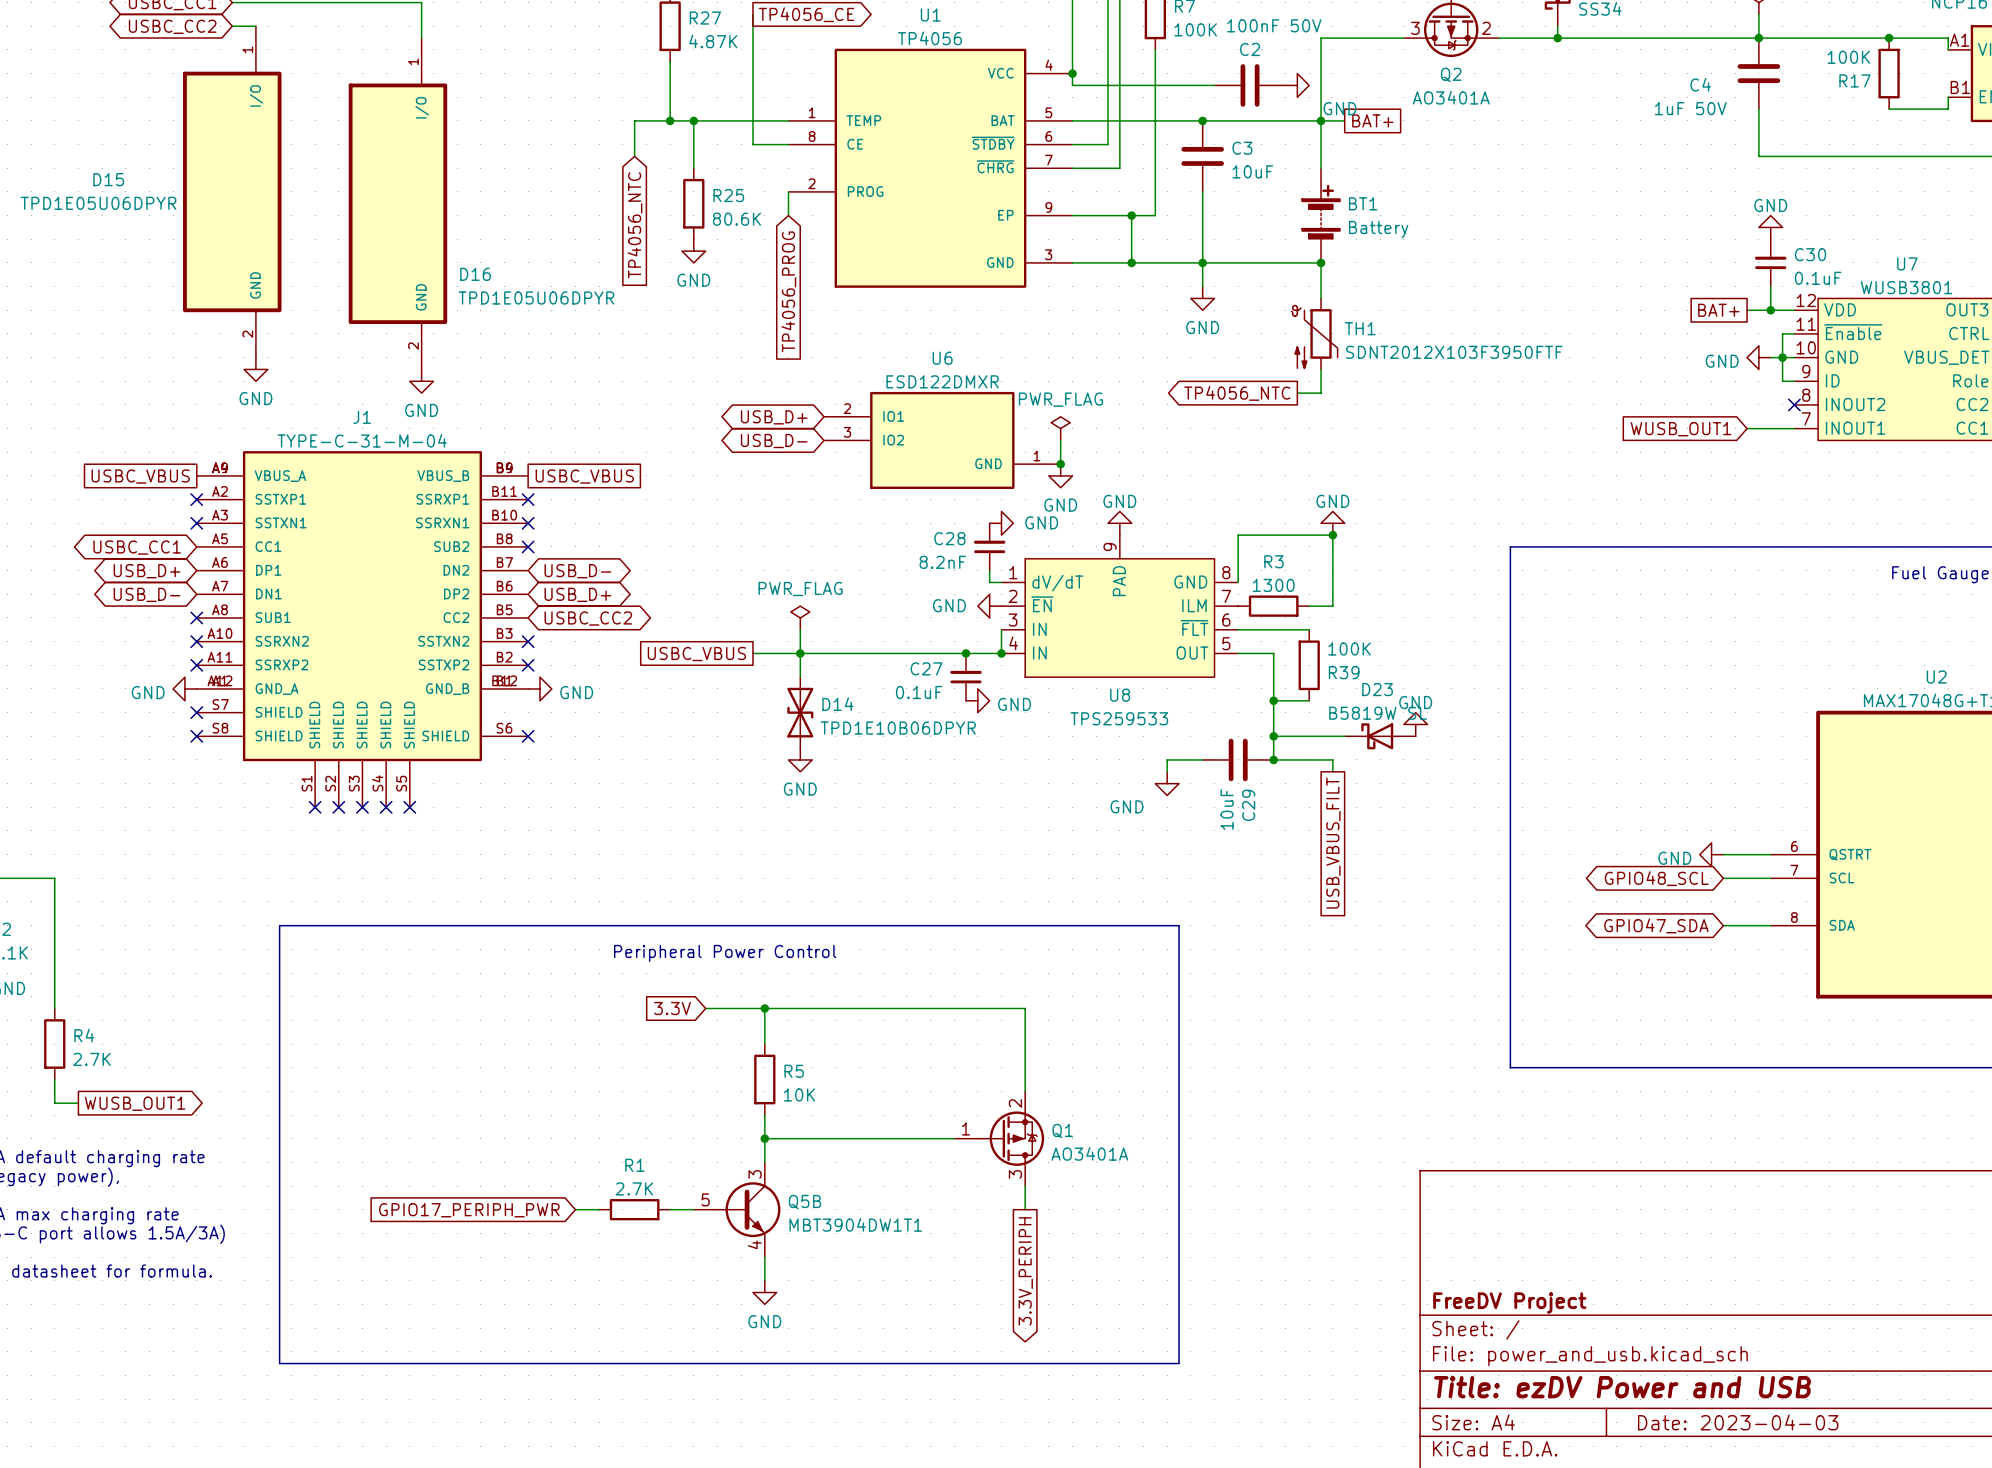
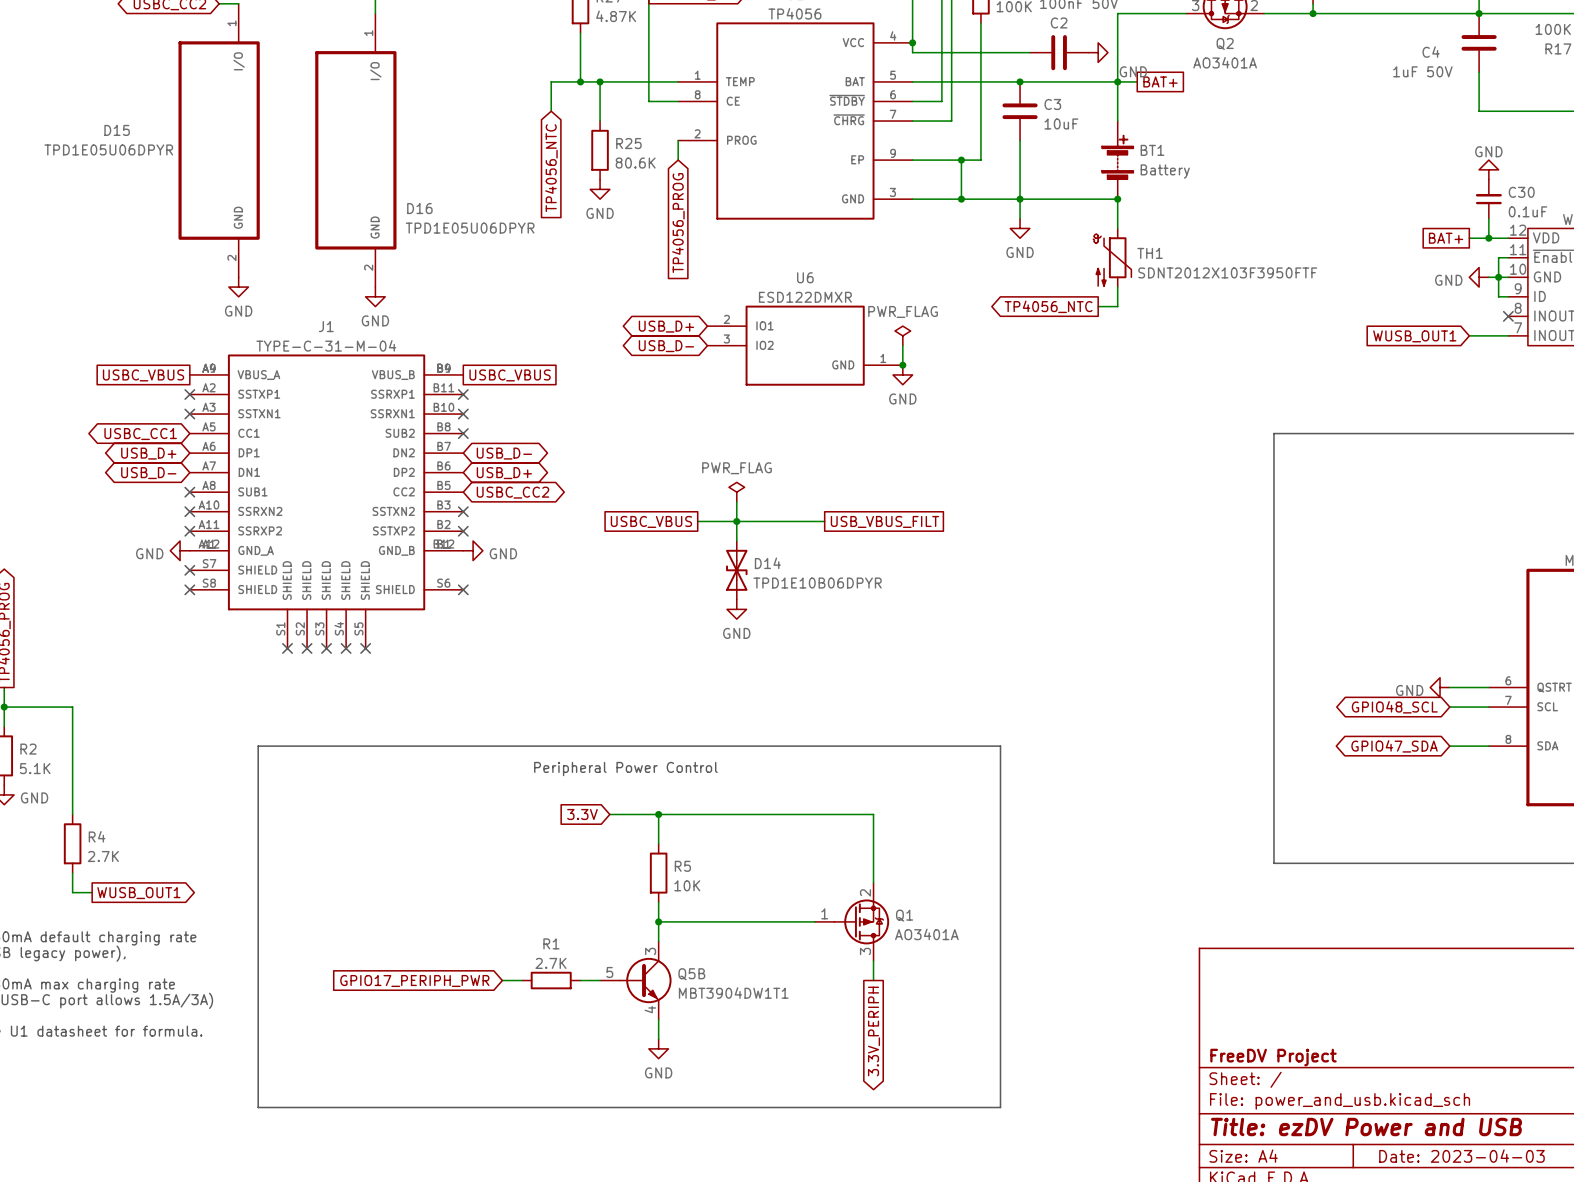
power symbol: GND (1001, 523) -> none
power symbol: GND (1119, 523) -> none
power symbol: GND (1332, 523) -> none
junction: (1332, 535) -> none
C28: 8.2nF (989, 546) -> none
wire: (989, 570) (989, 582) (1001, 582) -> none
wire: (1238, 582) (1238, 535) (1332, 535) (1332, 606) (1309, 606) -> none
power symbol: GND (989, 606) -> none
U8: TPS259533 (1119, 606) -> none
R3: 1300 (1273, 606) -> none
power symbol position: PWR_FLAG (800, 617) -> PWR_FLAG (736, 492)
wire: (800, 629) (800, 677) -> (736, 501) (736, 541)
wire: (1001, 629) (1001, 653) (966, 653) -> none
wire: (1238, 629) (1309, 629) -> none
wire: (752, 653) (812, 653) -> none
junction: (800, 653) -> none
junction: none -> (736, 521)
junction: (966, 653) -> none
junction: (1001, 653) -> none
wire: (1238, 653) (1273, 653) (1273, 759) (1332, 759) (1332, 771) -> none
global label position: USBC_VBUS (696, 654) -> USBC_VBUS (651, 521)
global label: none -> USB_VBUS_FILT (884, 521)
R39: 100K (1309, 665) -> none
C27: 0.1uF (966, 677) -> none
power symbol: GND (977, 700) -> none
wire: (1273, 700) (1309, 700) -> none
junction: (1273, 700) -> none
D14 position: (800, 712) -> (736, 570)
power symbol: GND (1415, 724) -> none
wire: (1273, 736) (1344, 736) -> none
junction: (1273, 736) -> none
D23: B5819W SL (1380, 736) -> none
power symbol position: GND (800, 759) -> GND (736, 609)
wire: (1202, 759) (1167, 759) (1167, 771) -> none
C29: 10uF (1238, 759) -> none
junction: (1273, 759) -> none
power symbol: GND (1167, 783) -> none
global label: USB_VBUS_FILT (1333, 843) -> none

